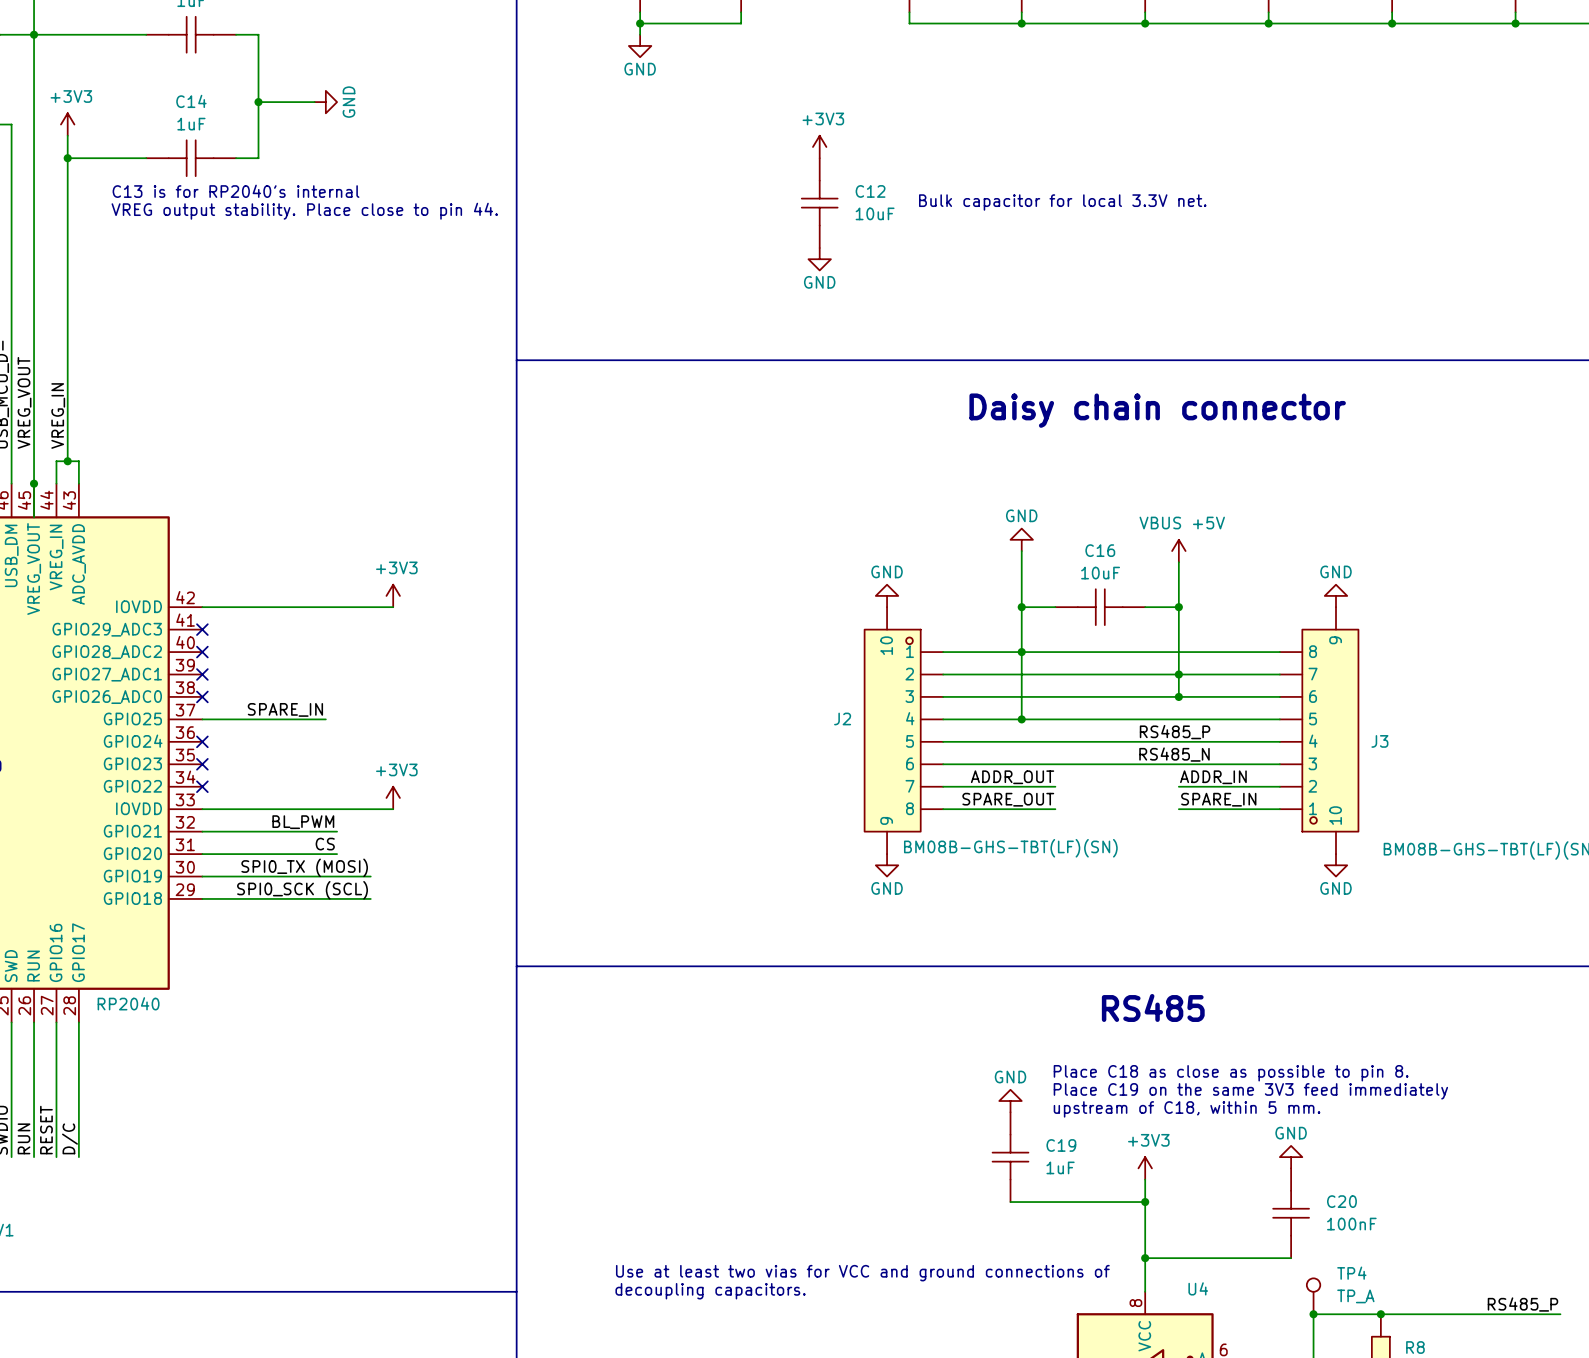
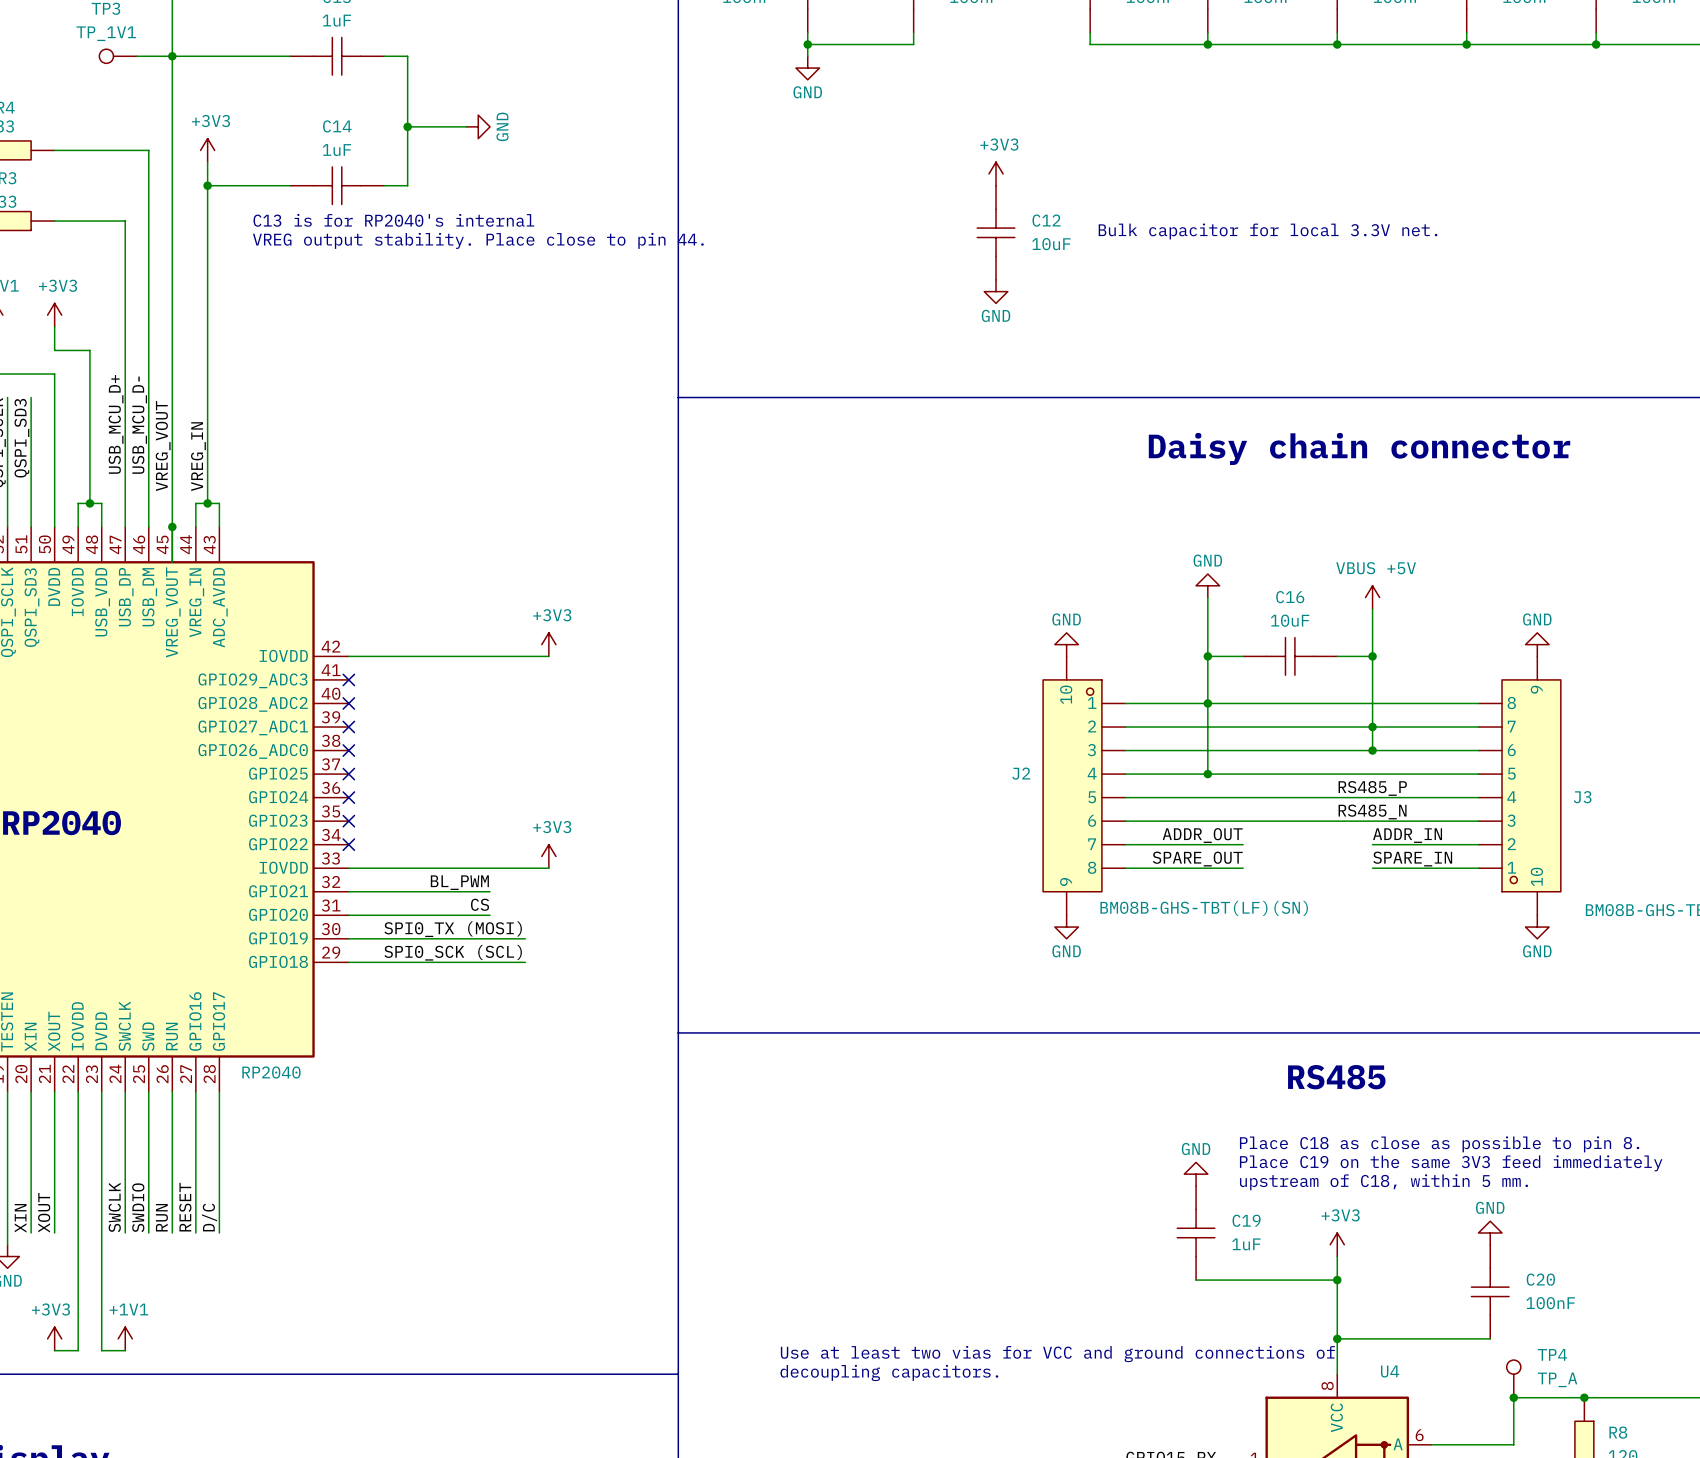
label: SPARE_IN (285, 709) -> none
wire: (202, 719) (325, 719) -> none
no-connect mark: none -> (348, 774)

